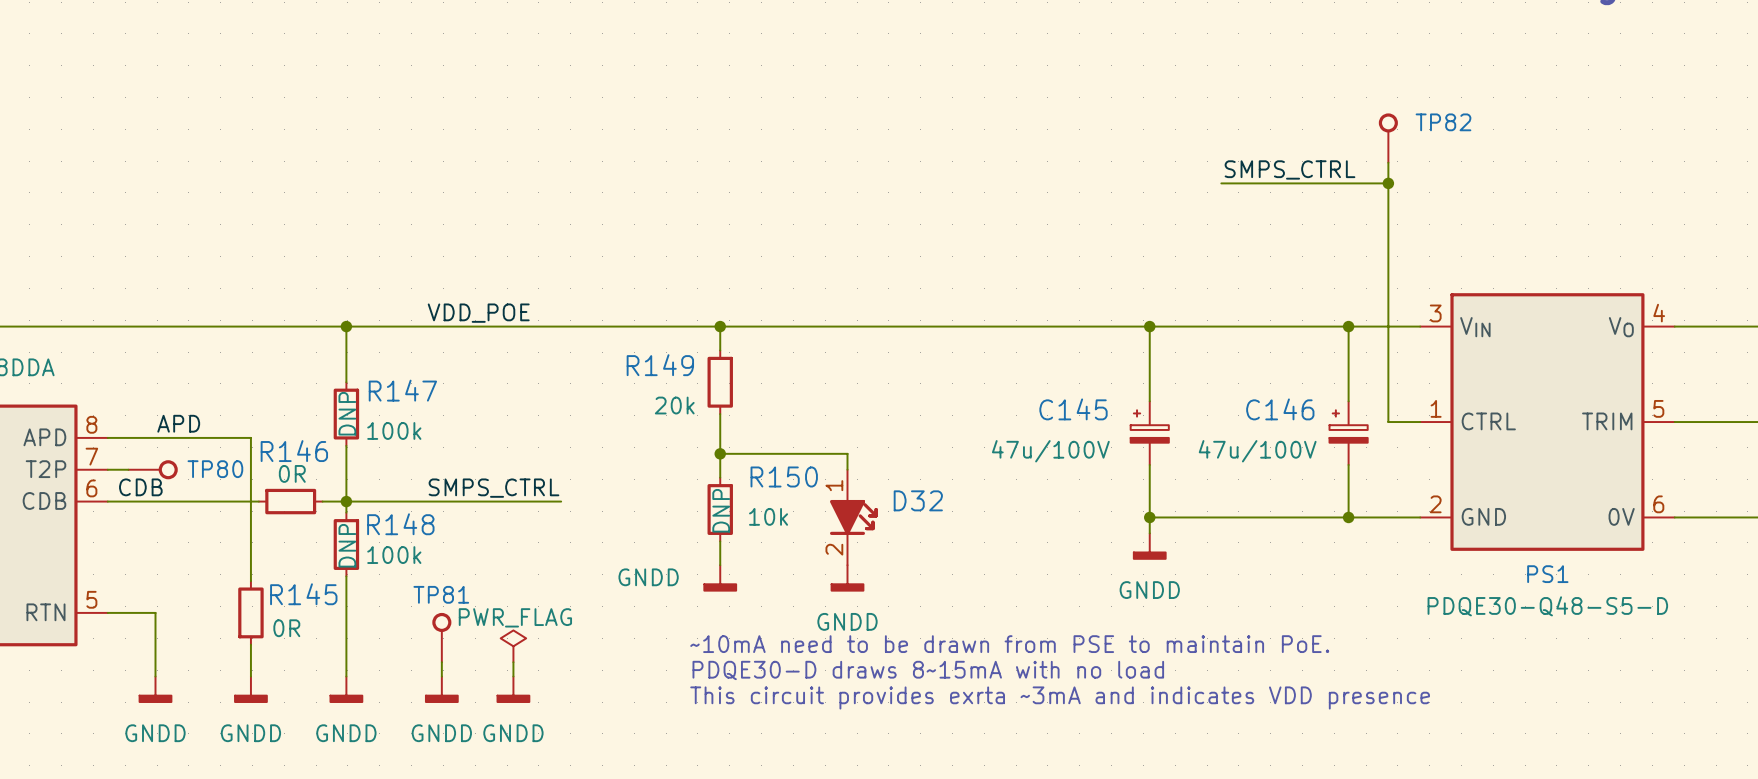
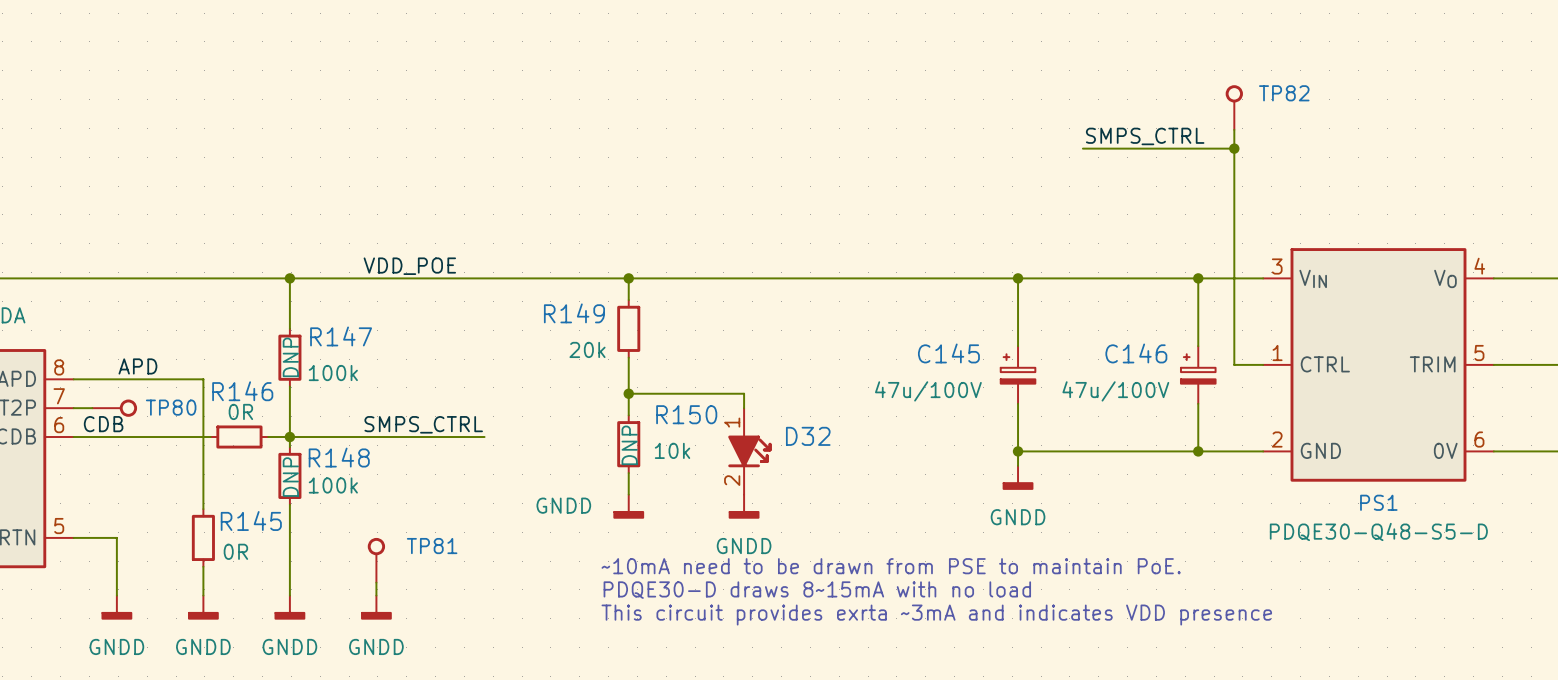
TP81 name position: TP81 (441, 594) -> TP81 (432, 546)
power symbol: PWR_FLAG (513, 646) -> none
wire: (513, 662) (513, 676) -> none
power symbol: GNDD (513, 689) -> none

